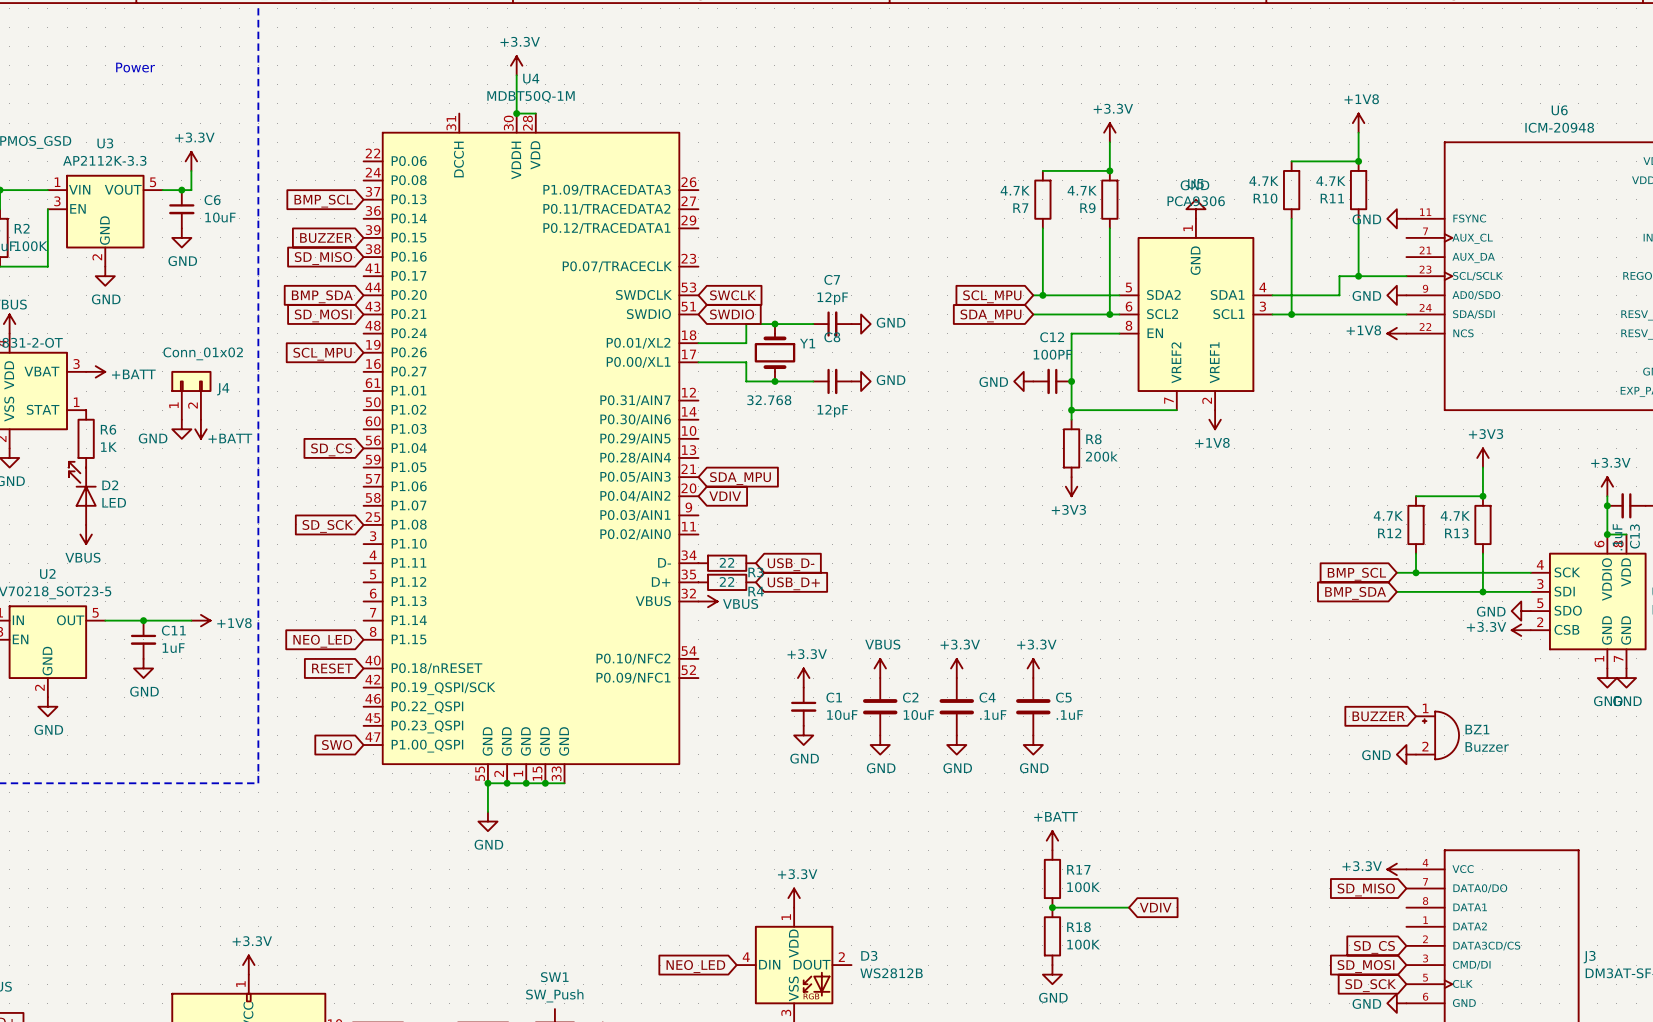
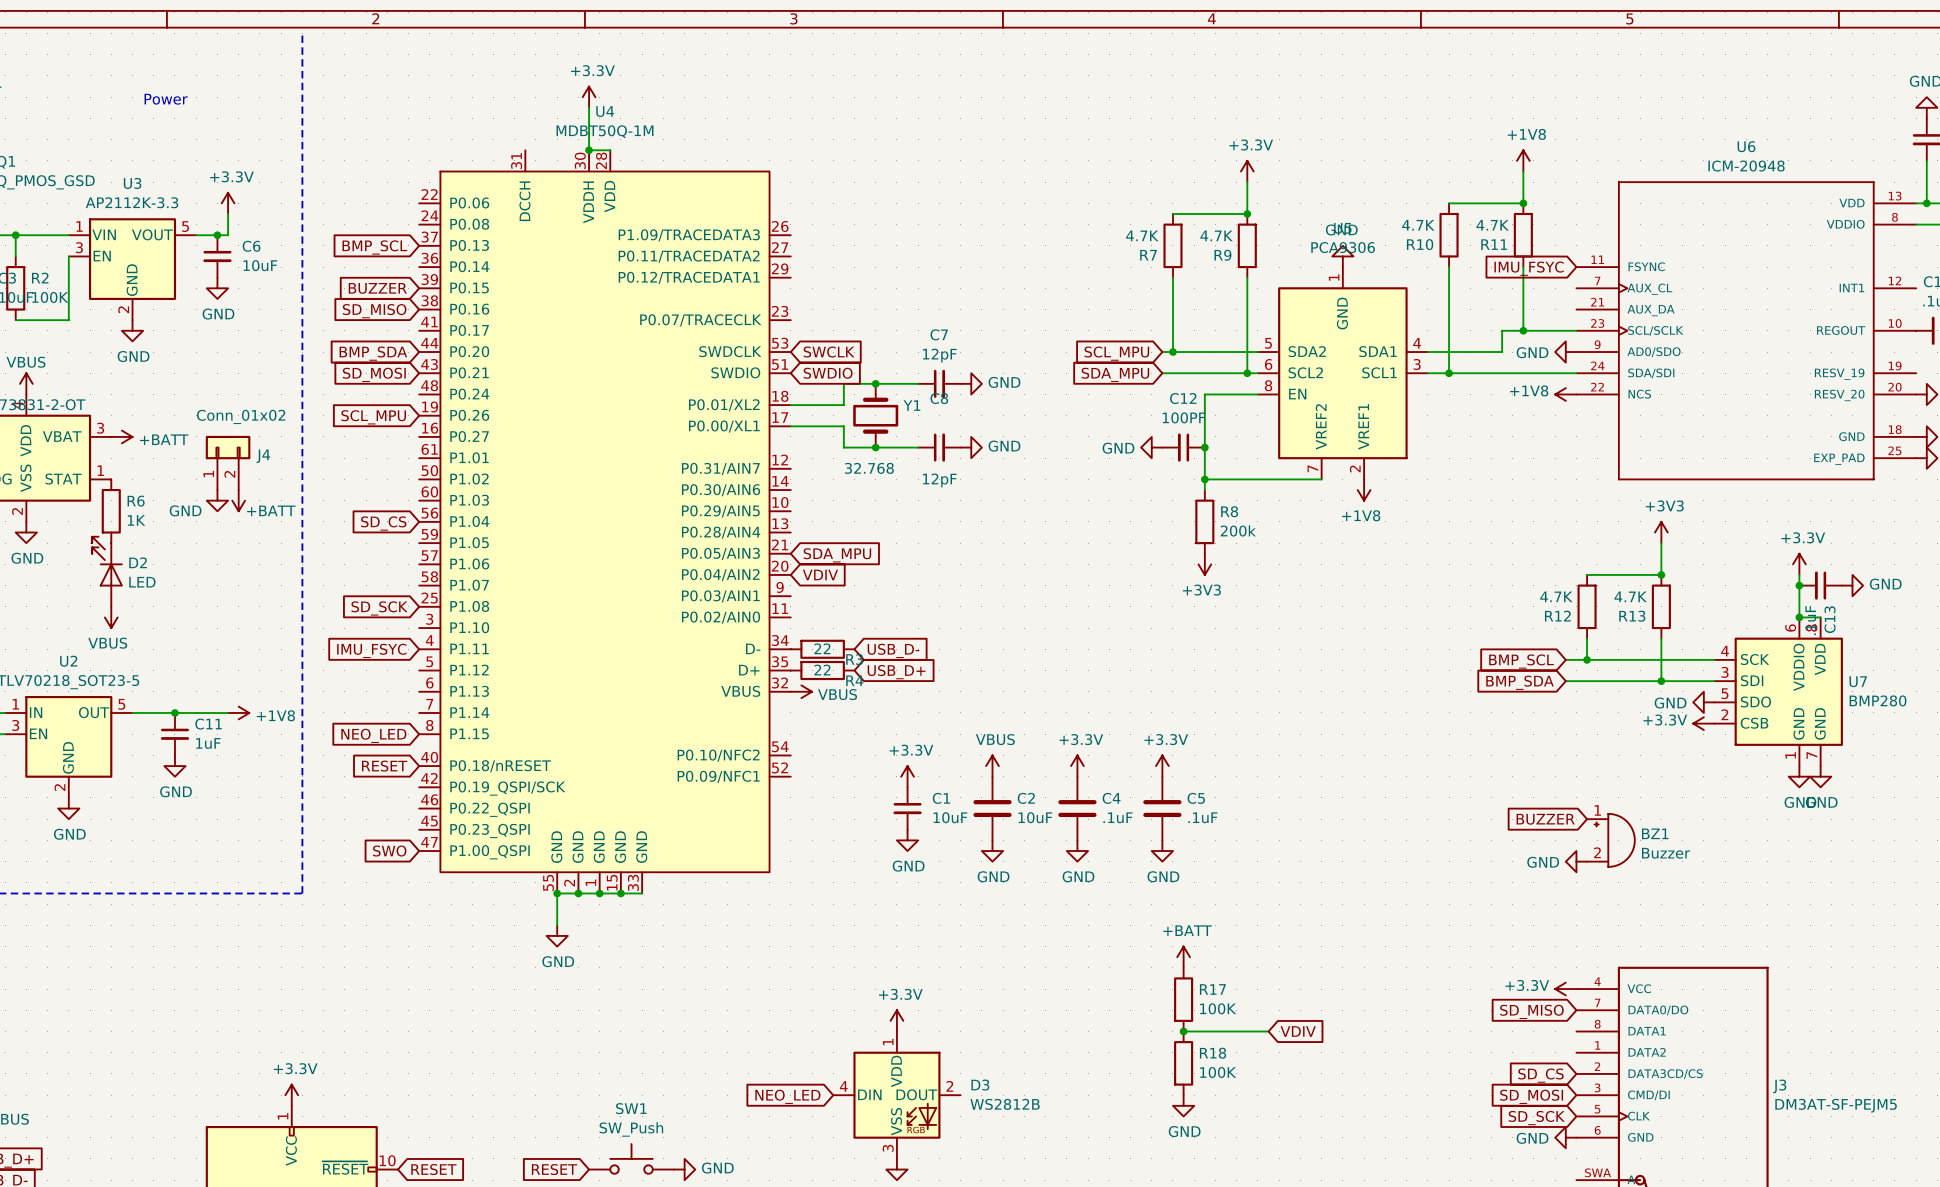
power symbol: GND (1396, 218) -> none
global label: none -> IMU_FSYC (1529, 268)
global label: none -> IMU_FSYC (371, 650)

